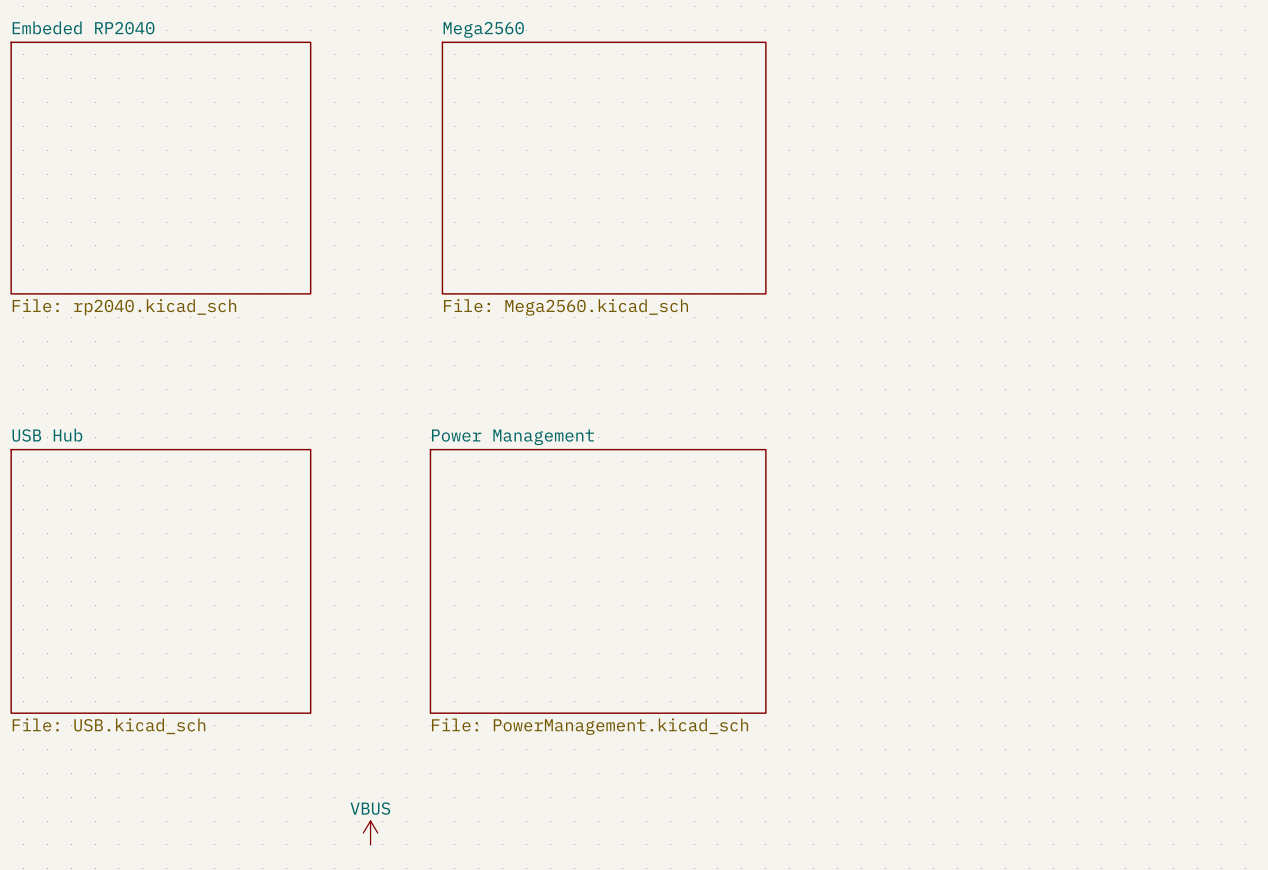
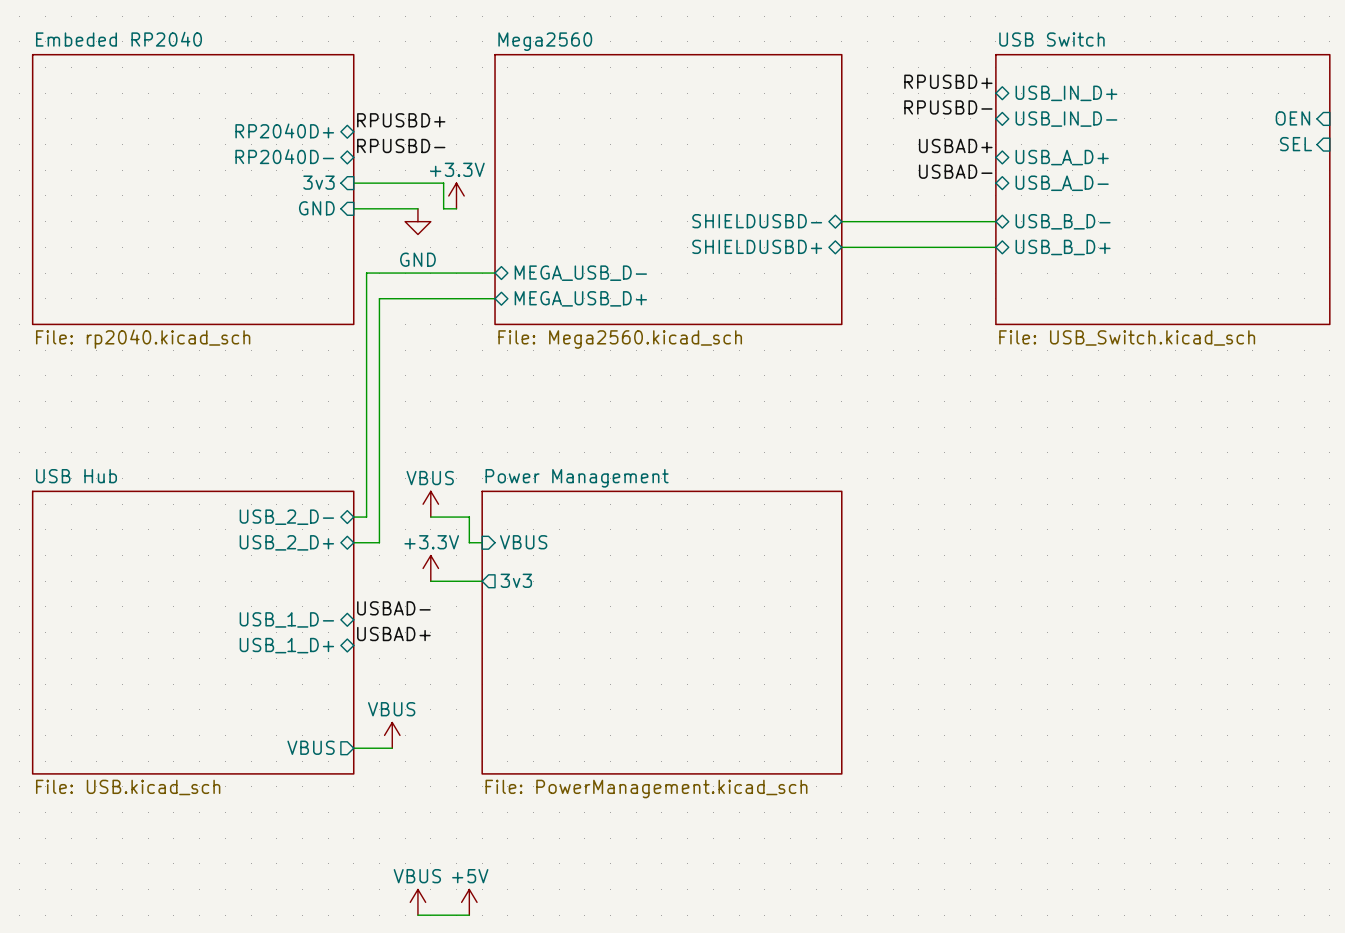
label: none -> RPUSBD+ (948, 81)
sheet pin: none -> USB_IN_D+ (1066, 93)
label: none -> RPUSBD- (948, 107)
sheet pin: none -> OEN (1292, 118)
label: none -> RPUSBD+ (401, 120)
sheet pin: none -> USB_IN_D- (1066, 119)
sheet pin: none -> RP2040D+ (284, 130)
sheet pin: none -> SEL (1295, 144)
label: none -> RPUSBD- (401, 145)
label: none -> USBAD+ (955, 145)
sheet pin: none -> RP2040D- (284, 156)
sheet pin: none -> USB_A_D+ (1062, 157)
label: none -> USBAD- (955, 171)
sheet pin: none -> 3v3 (318, 182)
wire: none -> (353, 183) (443, 183) (443, 208) (456, 208)
sheet pin: none -> USB_A_D- (1062, 183)
sheet USB Switch: none -> File: USB_Switch.kicad_sch (1162, 189)
power symbol: none -> +3.3V (456, 195)
sheet pin: none -> GND (316, 208)
wire: none -> (353, 208) (417, 208)
sheet pin: none -> SHIELDUSBD- (757, 221)
power symbol: none -> GND (417, 221)
wire: none -> (841, 221) (995, 221)
sheet pin: none -> USB_B_D- (1063, 221)
sheet pin: none -> SHIELDUSBD+ (757, 246)
wire: none -> (841, 247) (995, 247)
sheet pin: none -> USB_B_D+ (1063, 247)
wire: none -> (495, 273) (366, 273) (366, 517) (353, 517)
sheet pin: none -> MEGA_USB_D- (580, 273)
wire: none -> (495, 298) (379, 298) (379, 542) (353, 542)
sheet pin: none -> MEGA_USB_D+ (580, 298)
power symbol: none -> VBUS (430, 504)
wire: none -> (430, 517) (469, 517) (469, 542) (482, 542)
sheet pin: none -> USB_2_D- (286, 517)
sheet pin: none -> VBUS (523, 542)
sheet pin: none -> USB_2_D+ (286, 542)
power symbol: none -> +3.3V (430, 568)
wire: none -> (430, 581) (482, 581)
sheet pin: none -> 3v3 (516, 580)
label: none -> USBAD- (393, 608)
sheet pin: none -> USB_1_D- (286, 619)
label: none -> USBAD+ (393, 634)
sheet pin: none -> USB_1_D+ (286, 645)
power symbol: none -> VBUS (392, 735)
sheet pin: none -> VBUS (311, 747)
wire: none -> (353, 748) (392, 748)
power symbol: none -> +5V (469, 902)
wire: none -> (417, 915) (469, 915)

